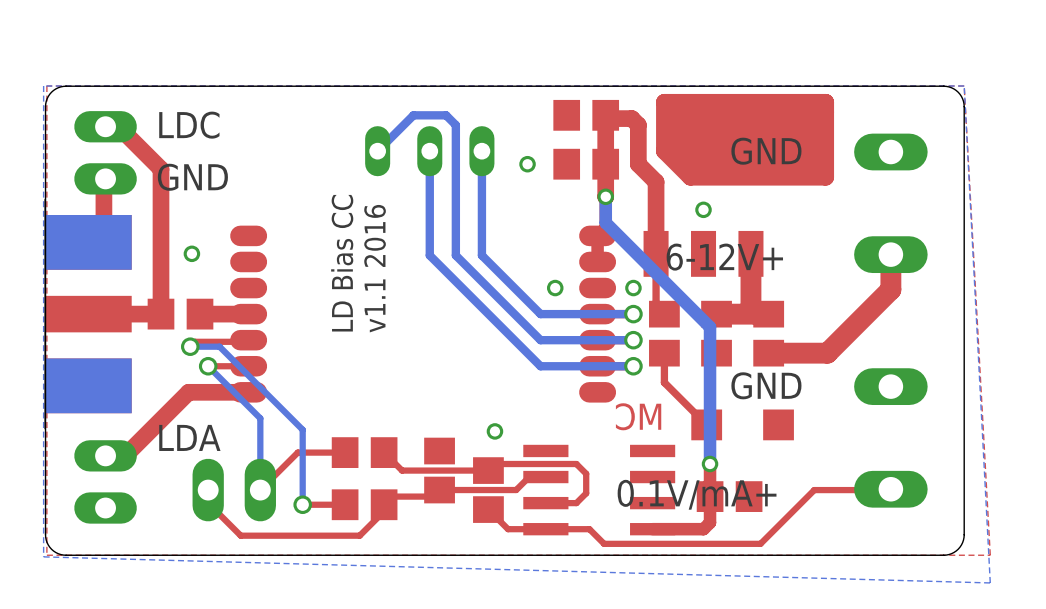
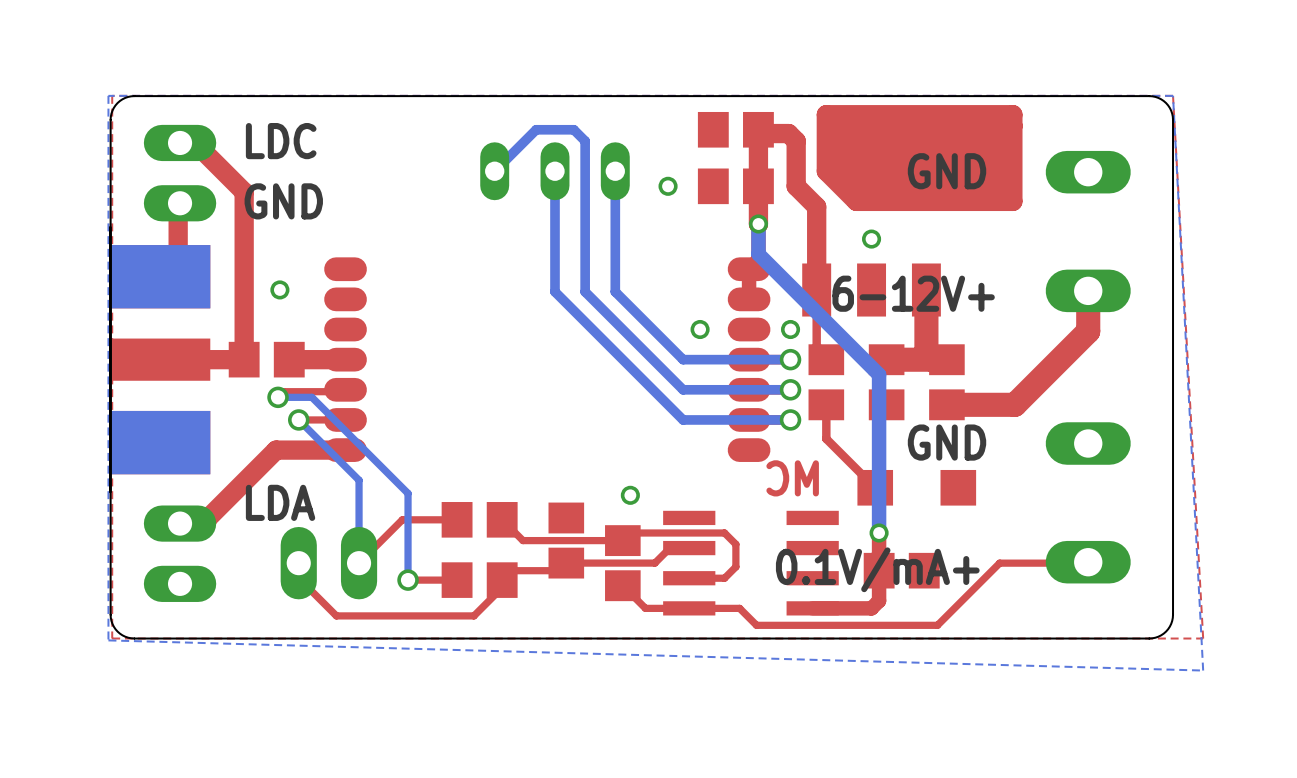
text: LD Bias CC (342, 263) -> none
text: v1.1 2016 (375, 268) -> none

